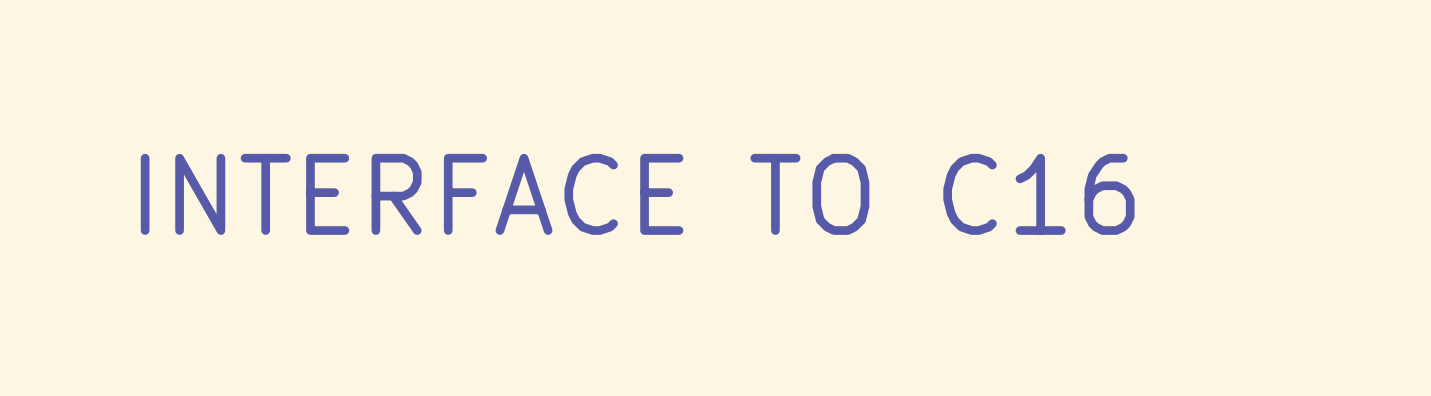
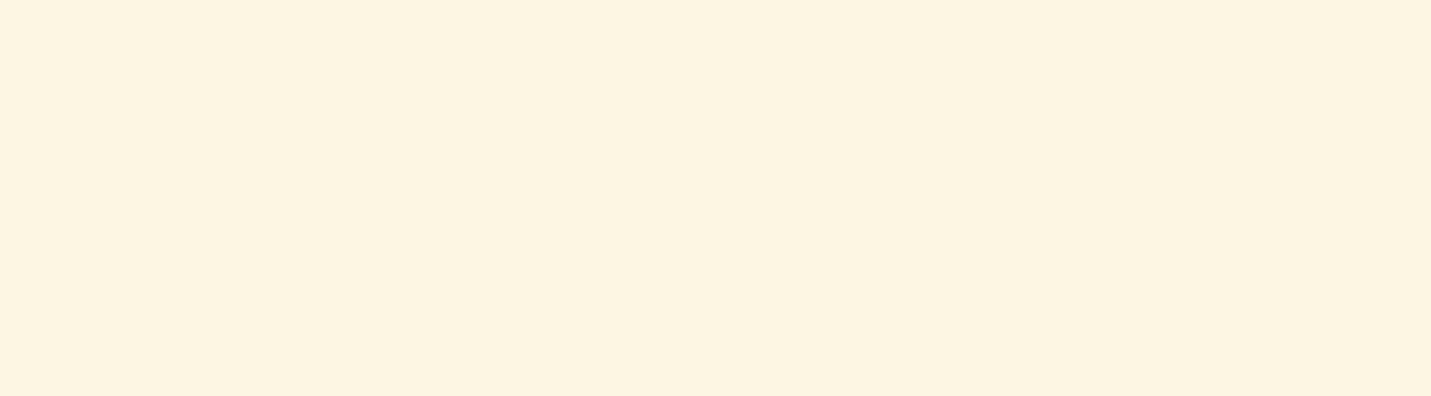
text: INTERFACE TO C16 (637, 194) -> none

